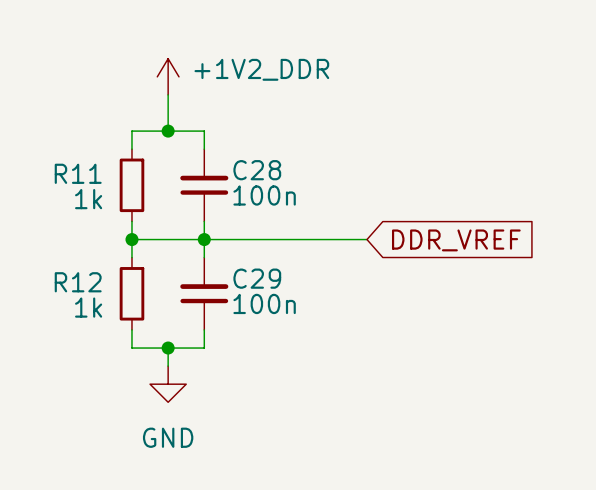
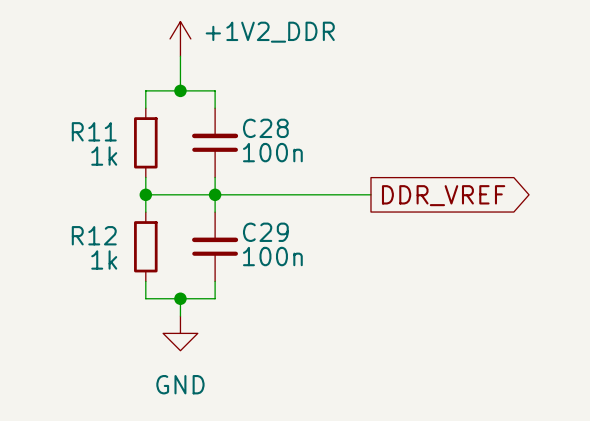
global label shape: input (456, 240) -> output (443, 195)

